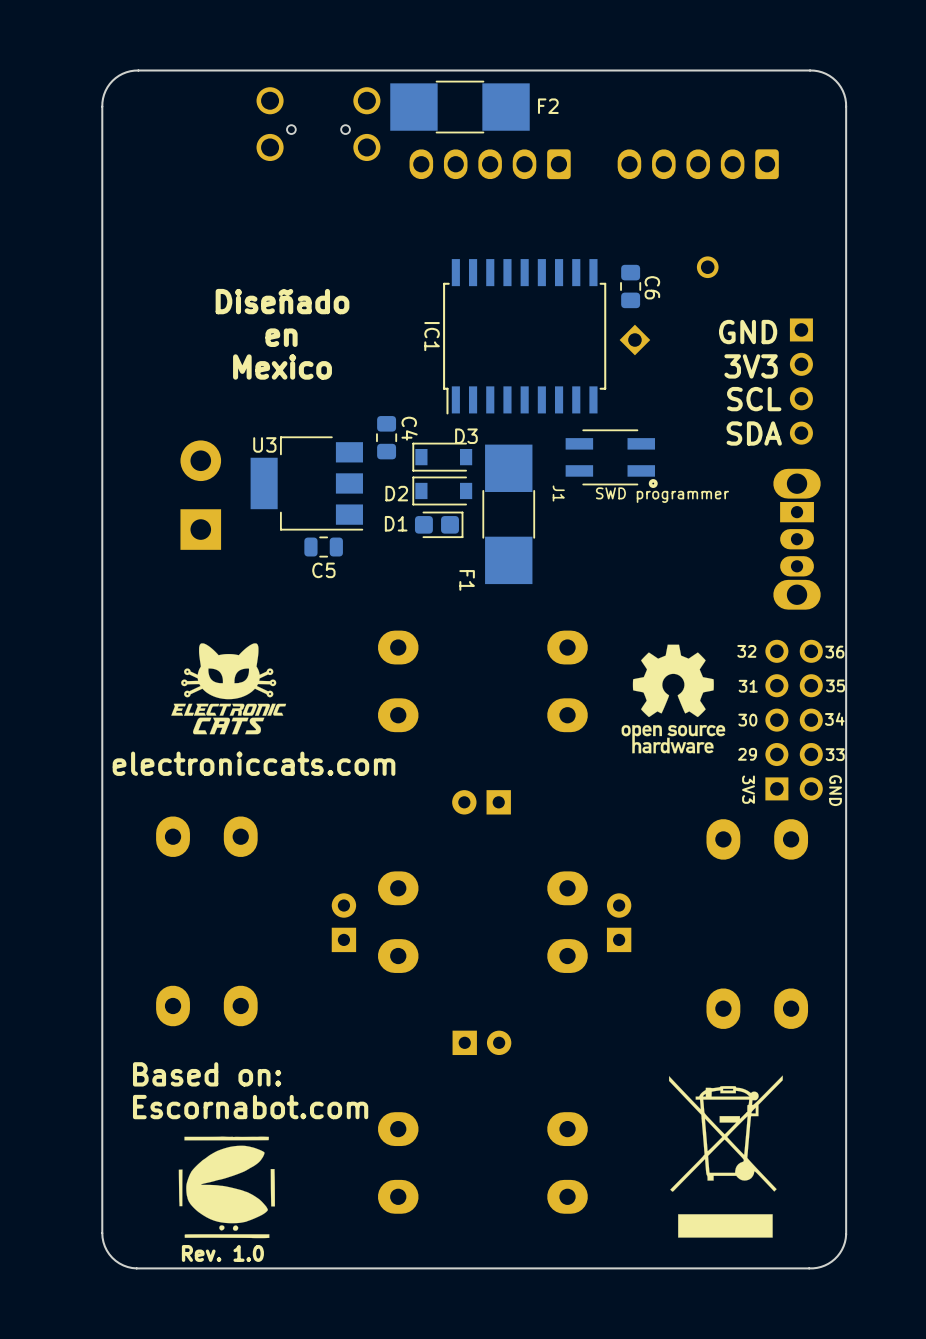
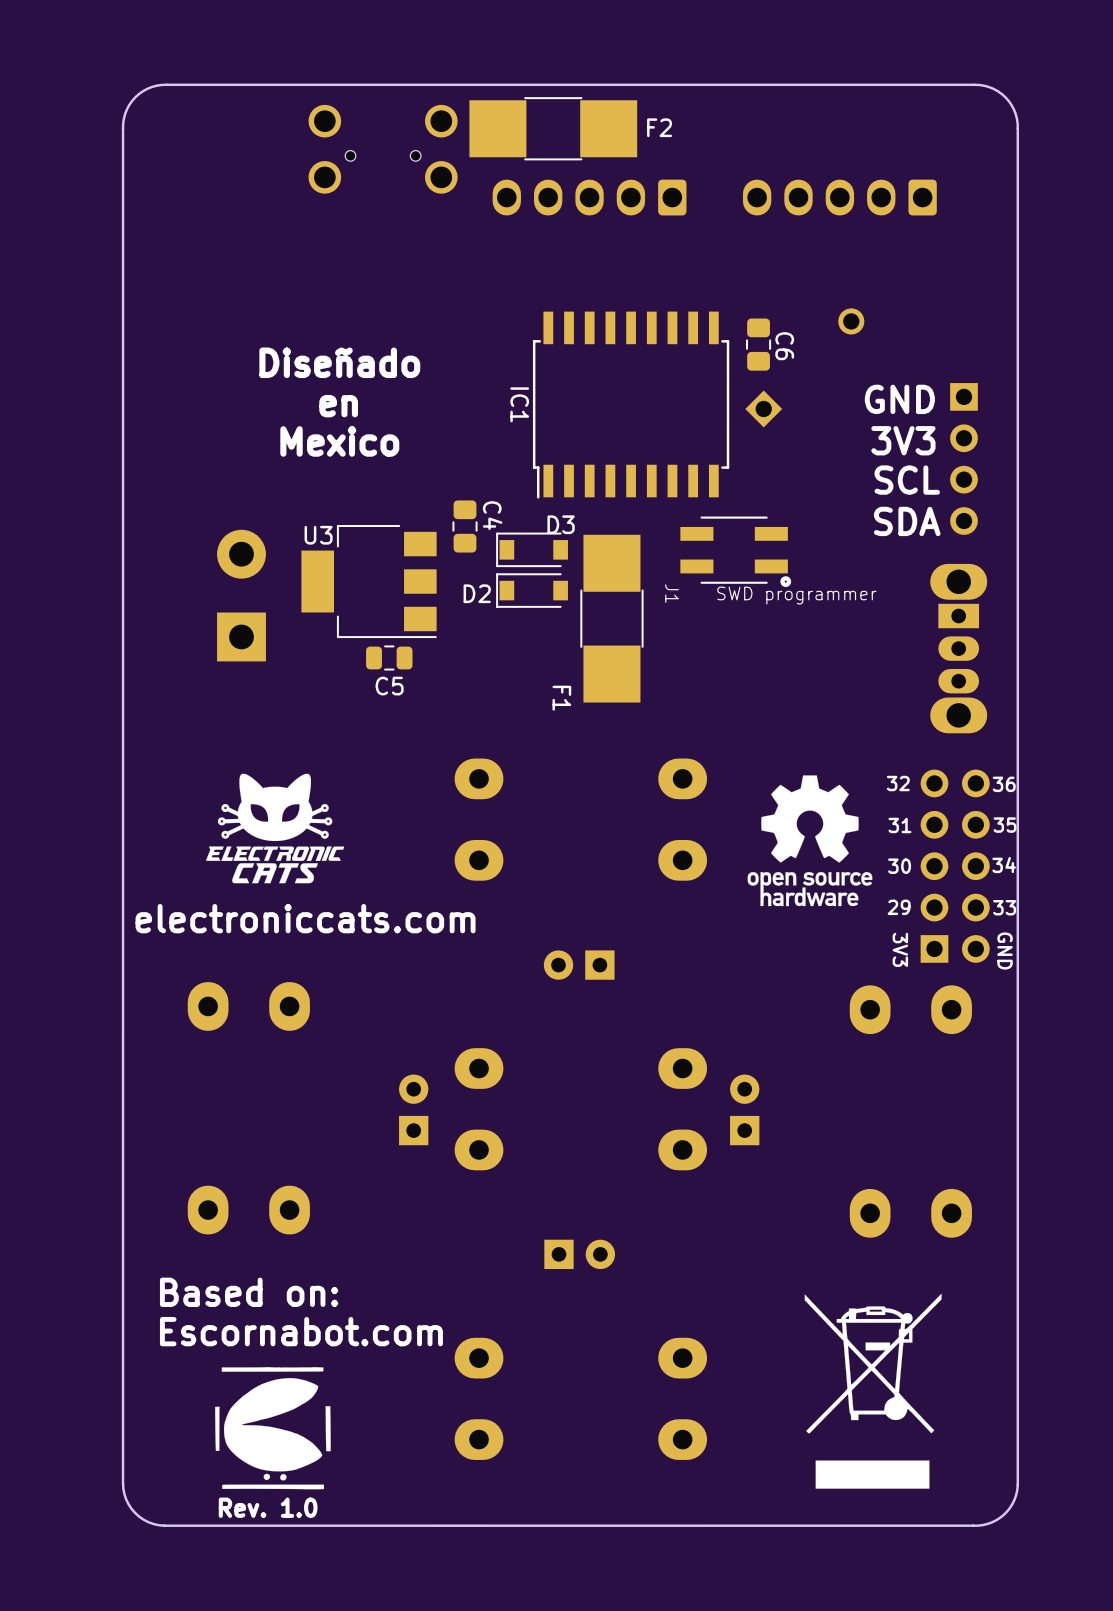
D1: (439, 524) -> none

